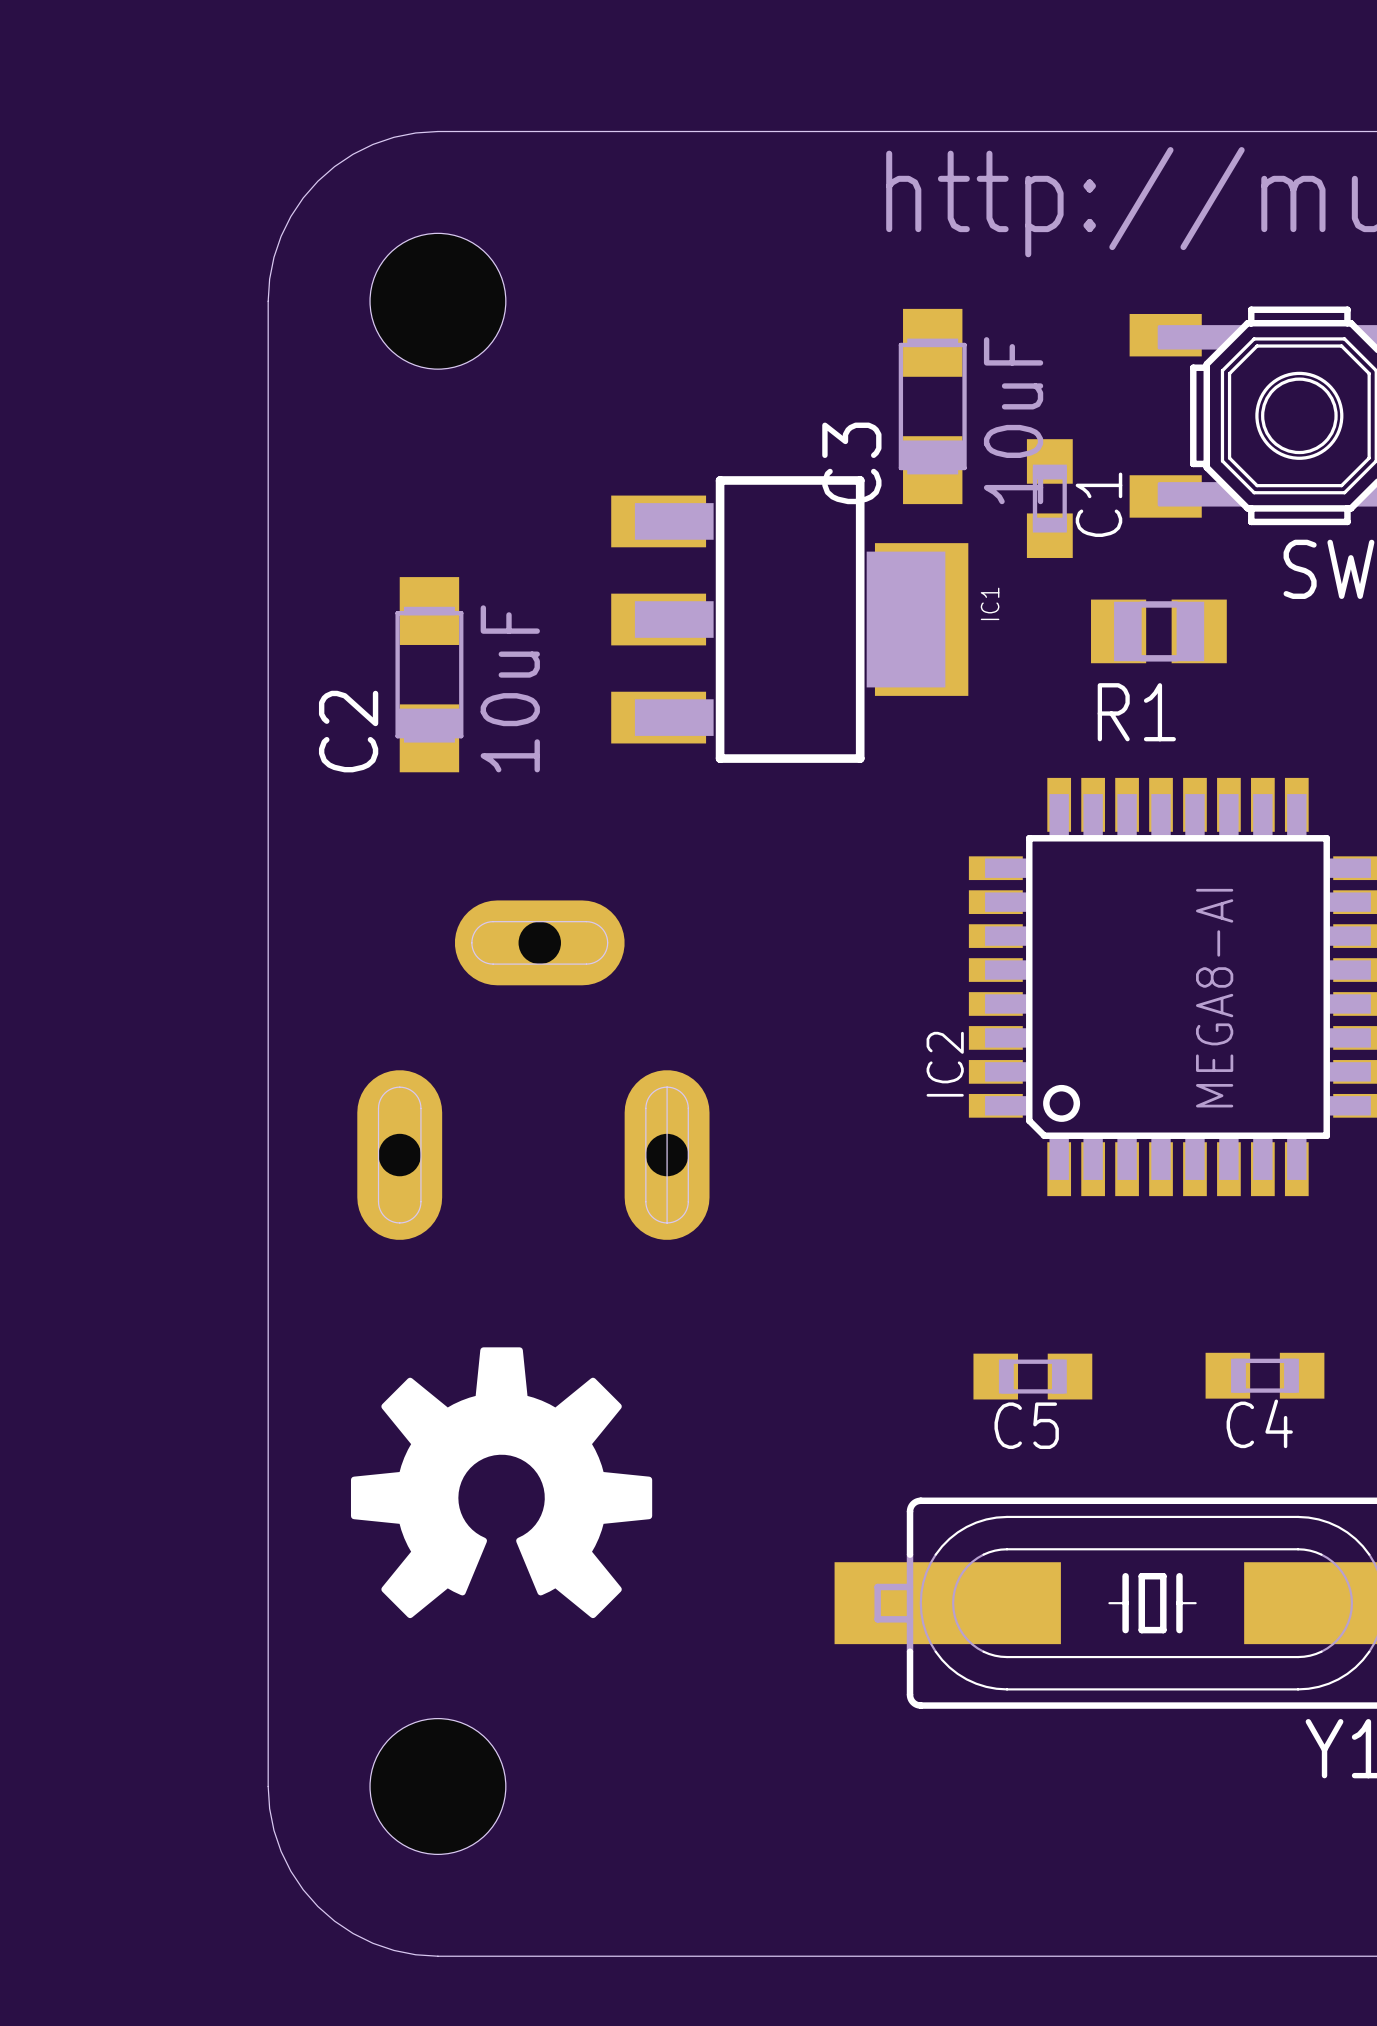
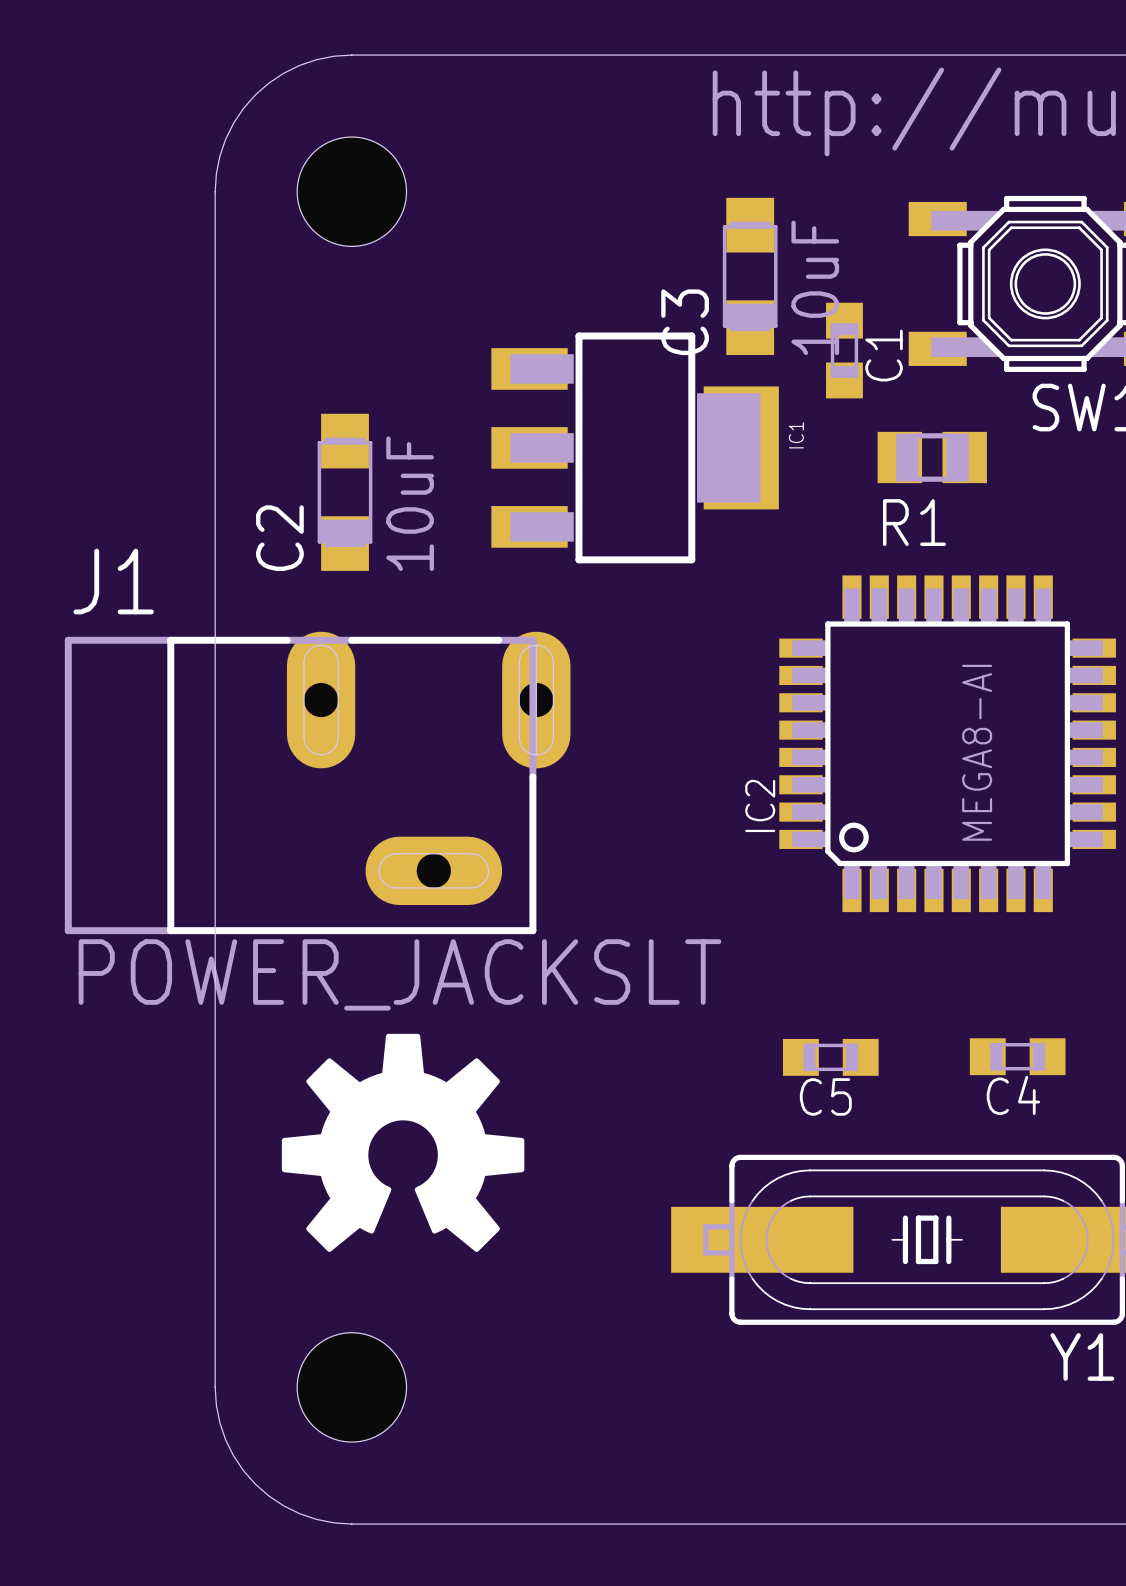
J1 side: bottom (533, 1070) -> top (317, 782)

